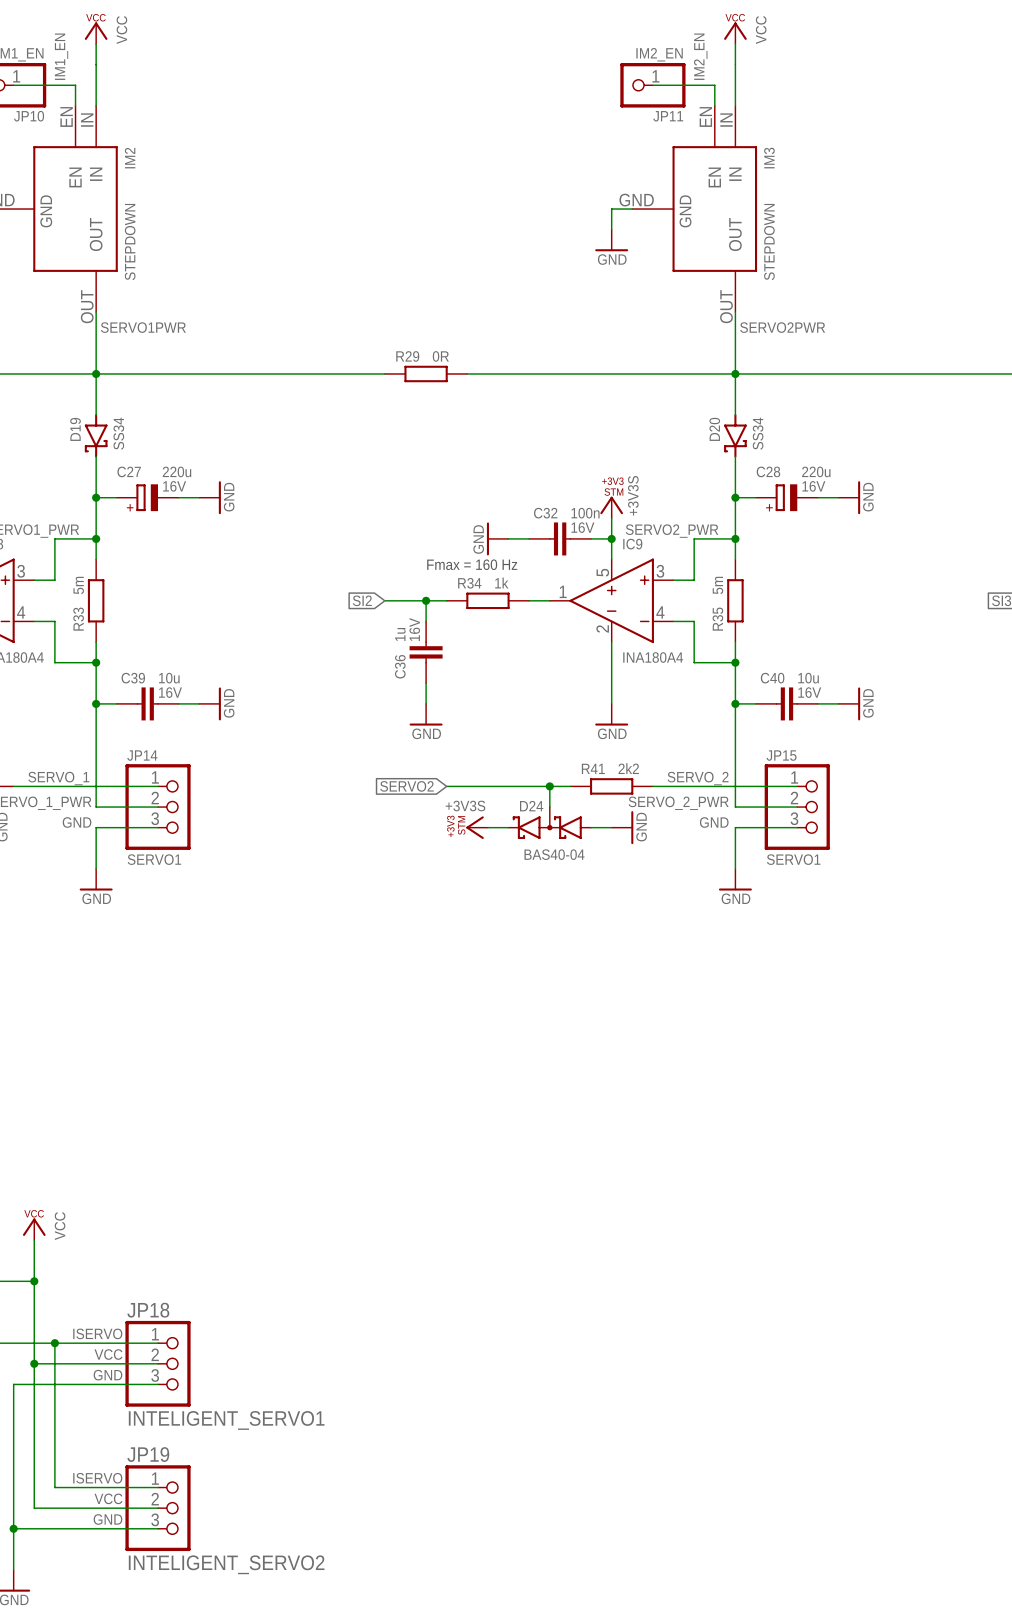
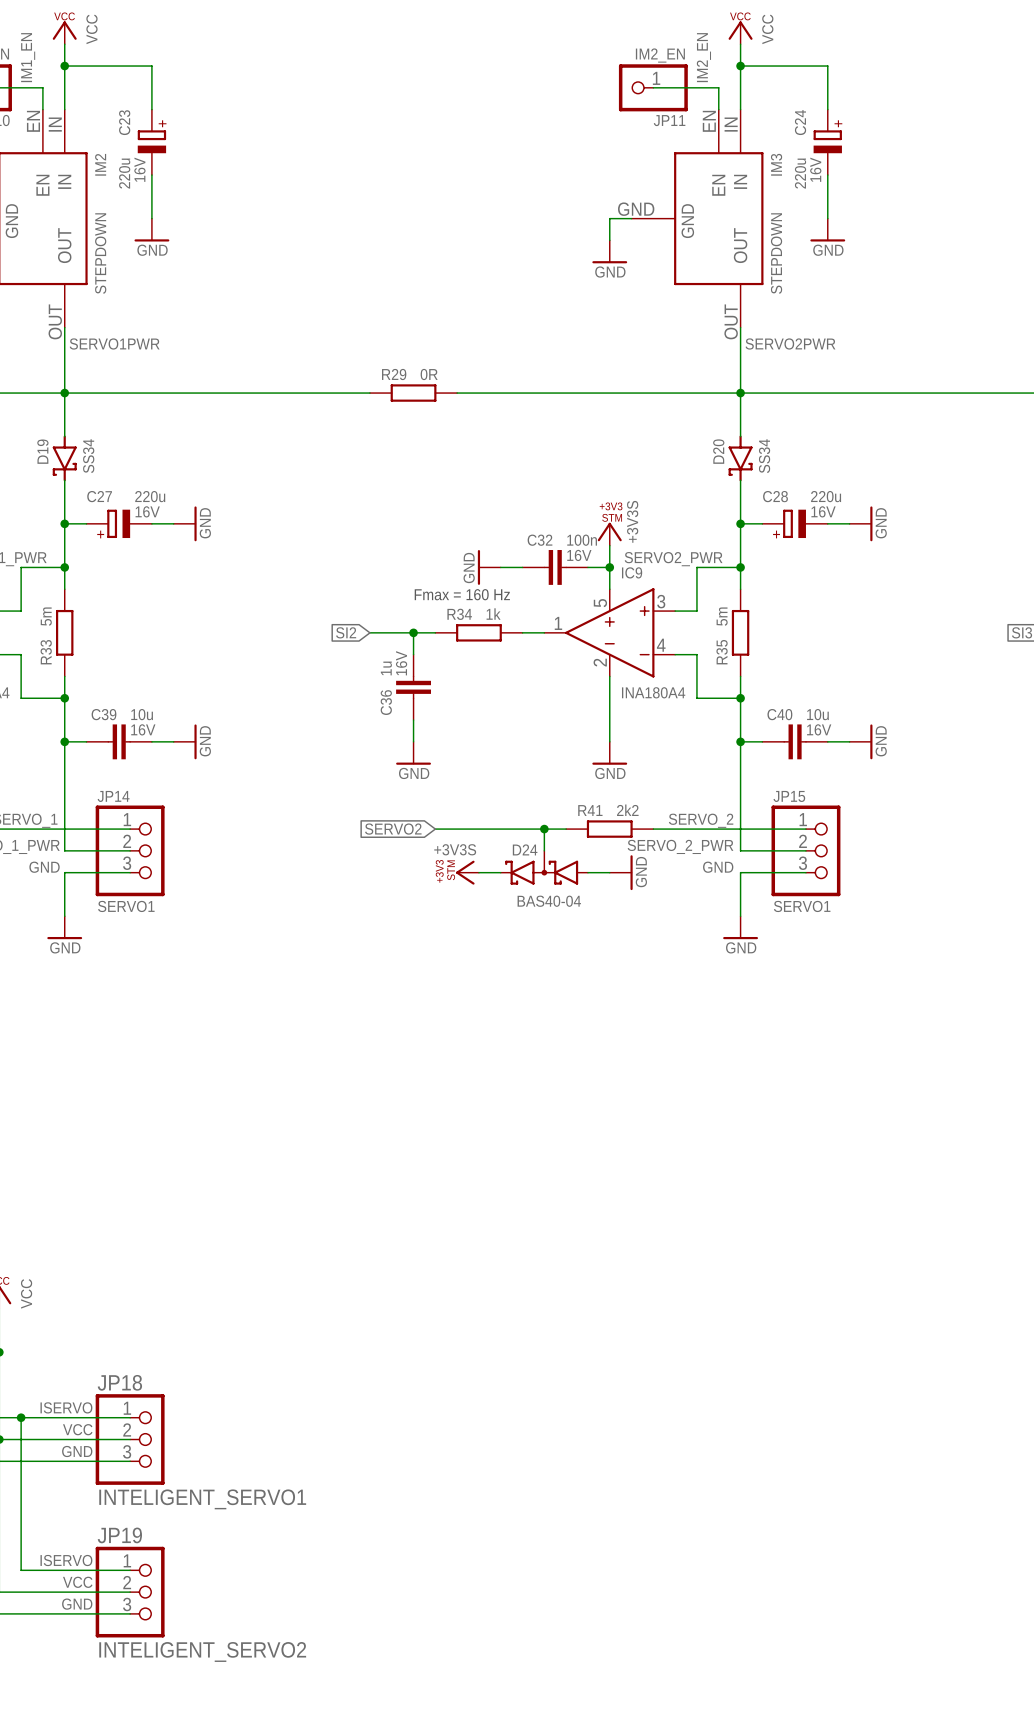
wire: none -> (64, 66) (151, 66) (151, 109)
junction: none -> (64, 66)
wire: none -> (740, 66) (827, 66) (827, 109)
junction: none -> (740, 66)
C23: none -> 220u (151, 142)
C24: none -> 220u (827, 142)
wire: none -> (151, 175) (151, 218)
wire: none -> (827, 175) (827, 218)
power symbol: none -> GND (151, 230)
power symbol: none -> GND (827, 230)

